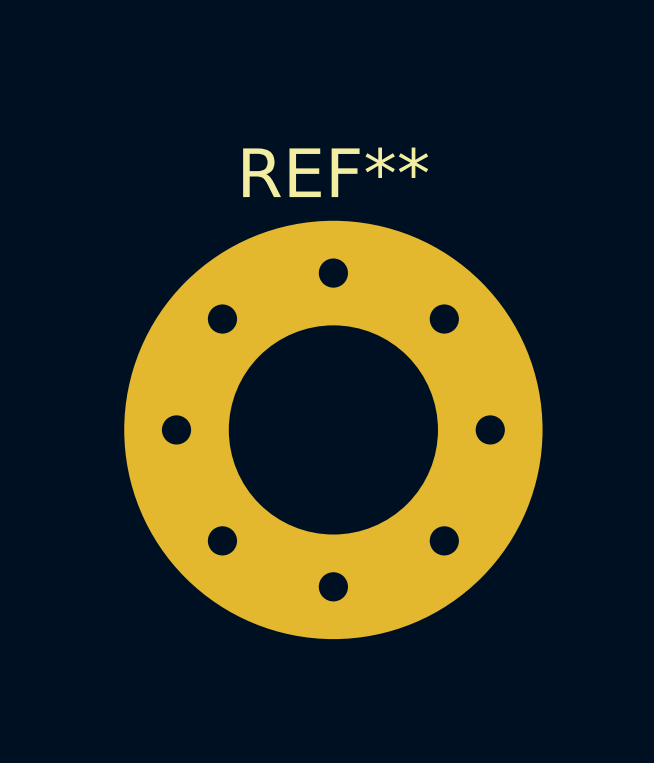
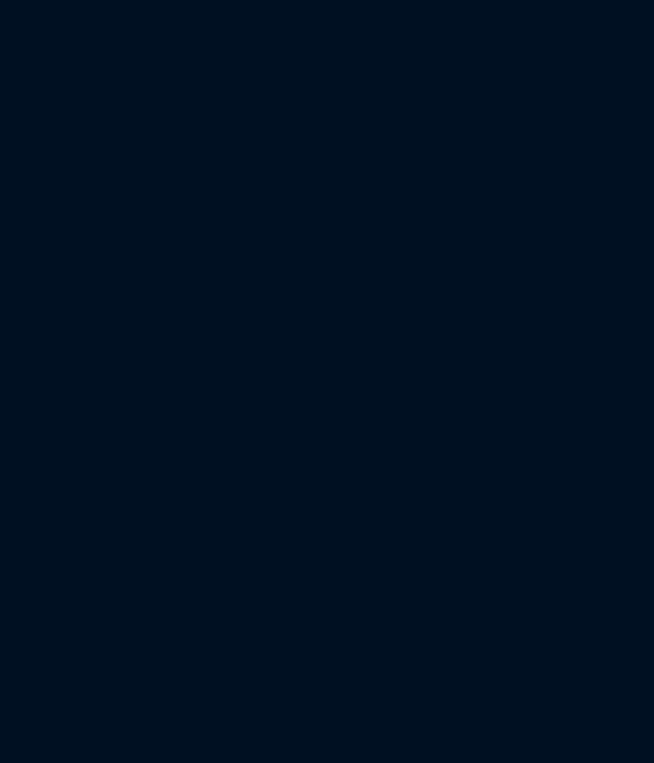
REF**: (333, 429) -> none

